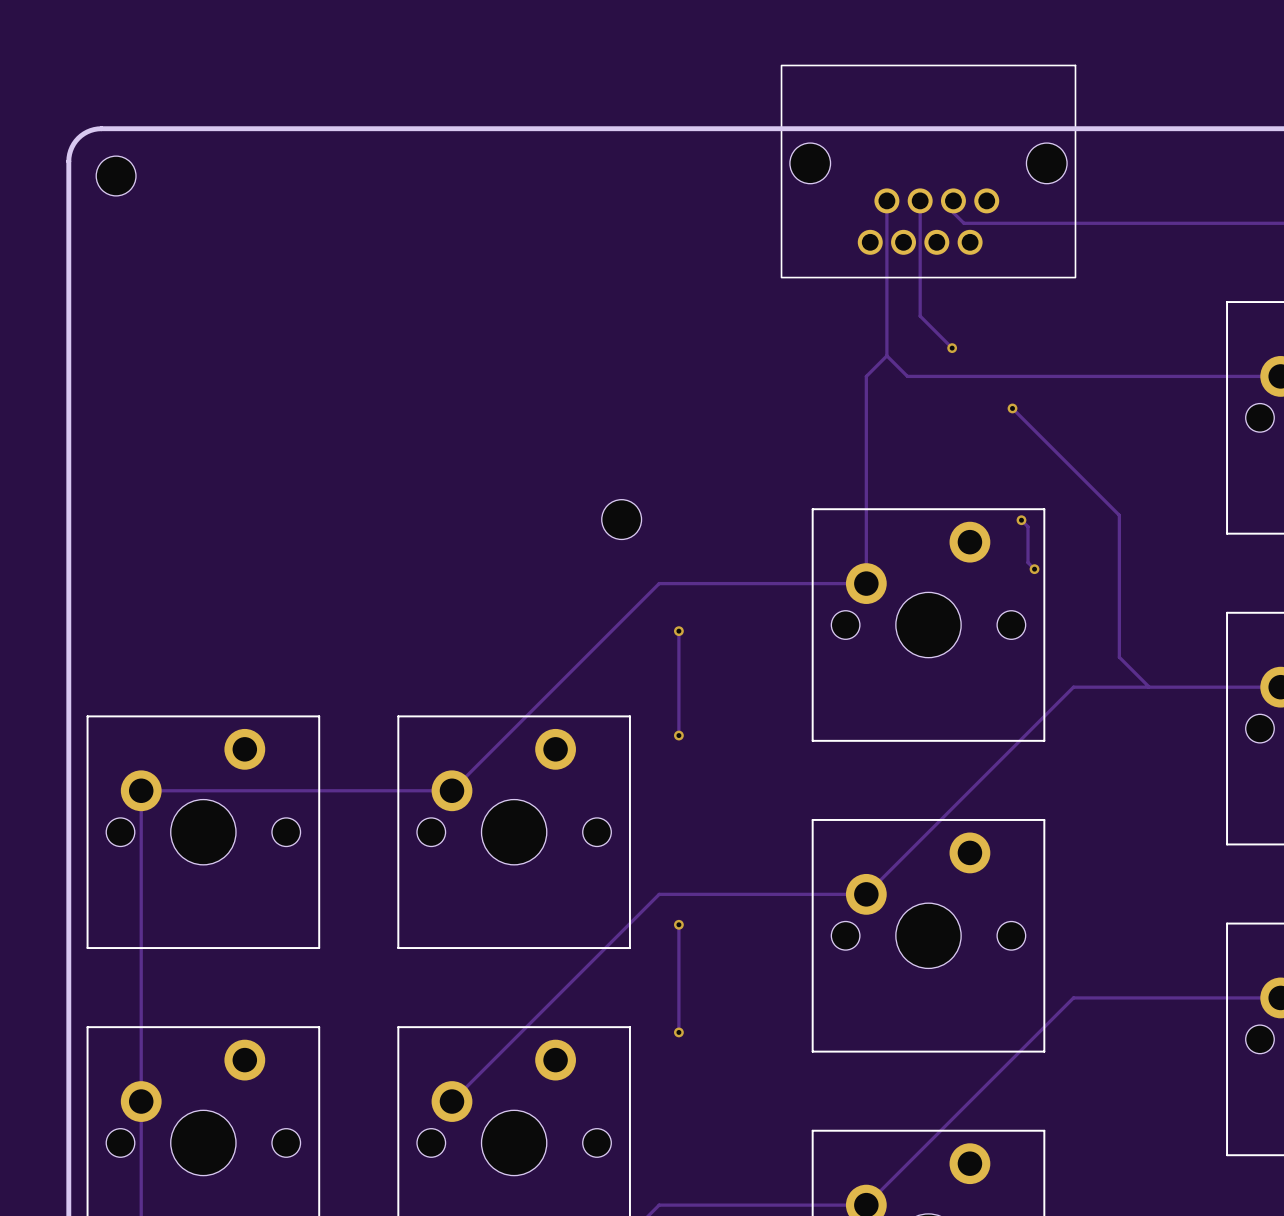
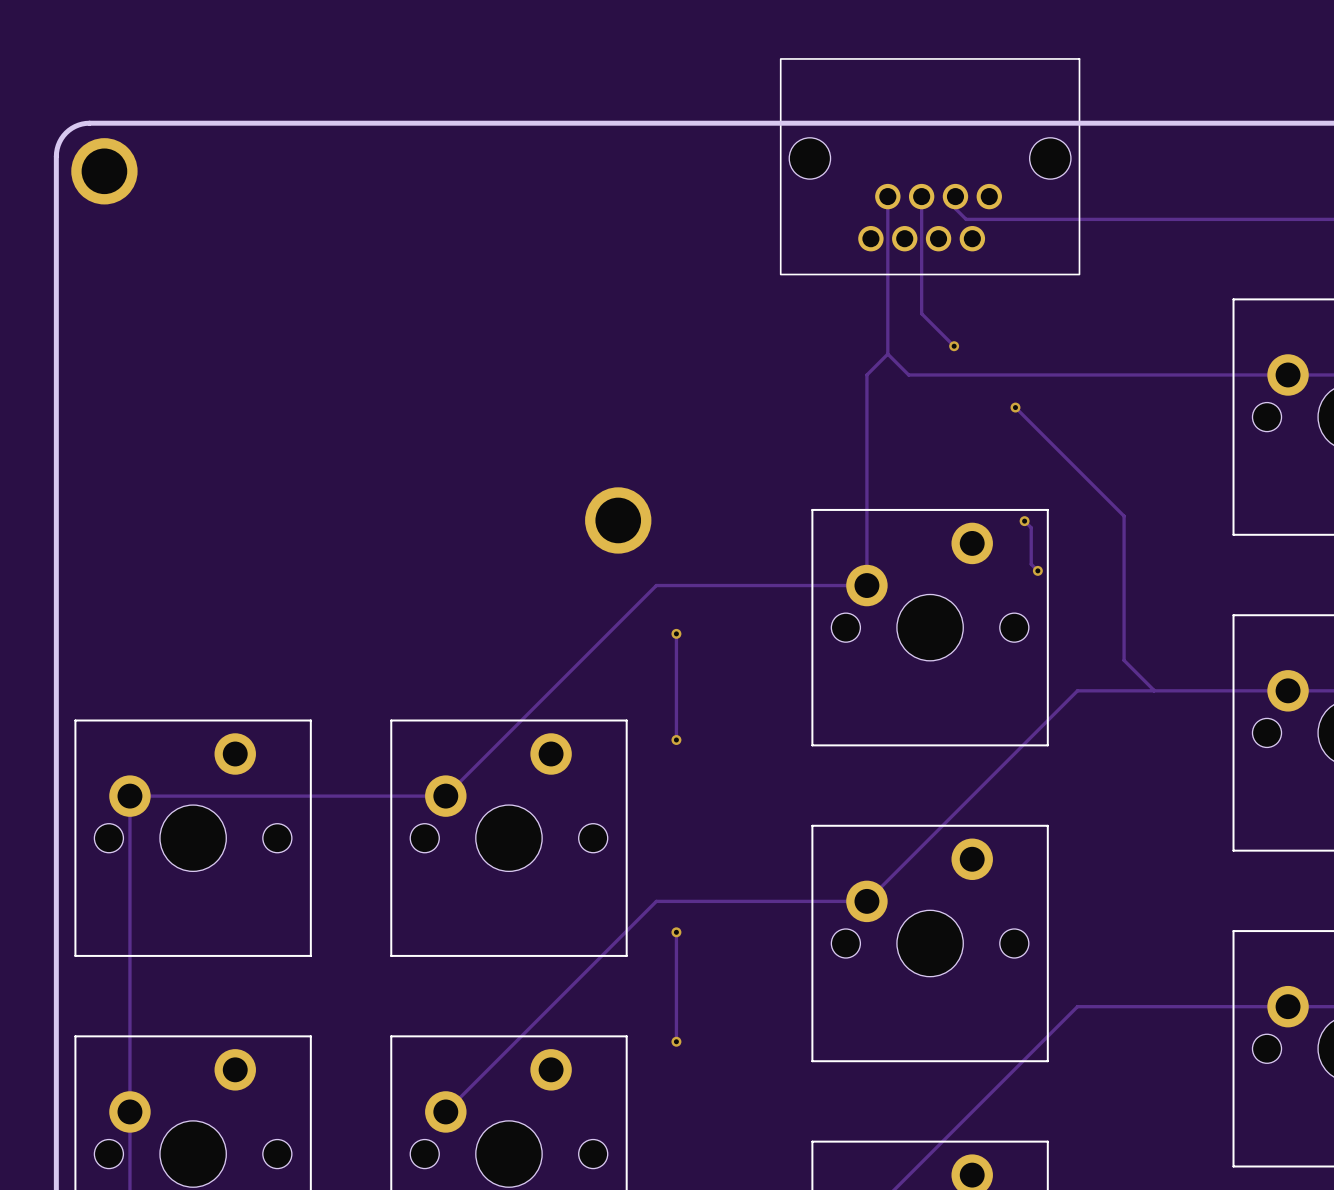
part footprint: [96, 156, 136, 196] -> [71, 138, 138, 205]
part footprint: [601, 499, 642, 540] -> [585, 487, 652, 554]

